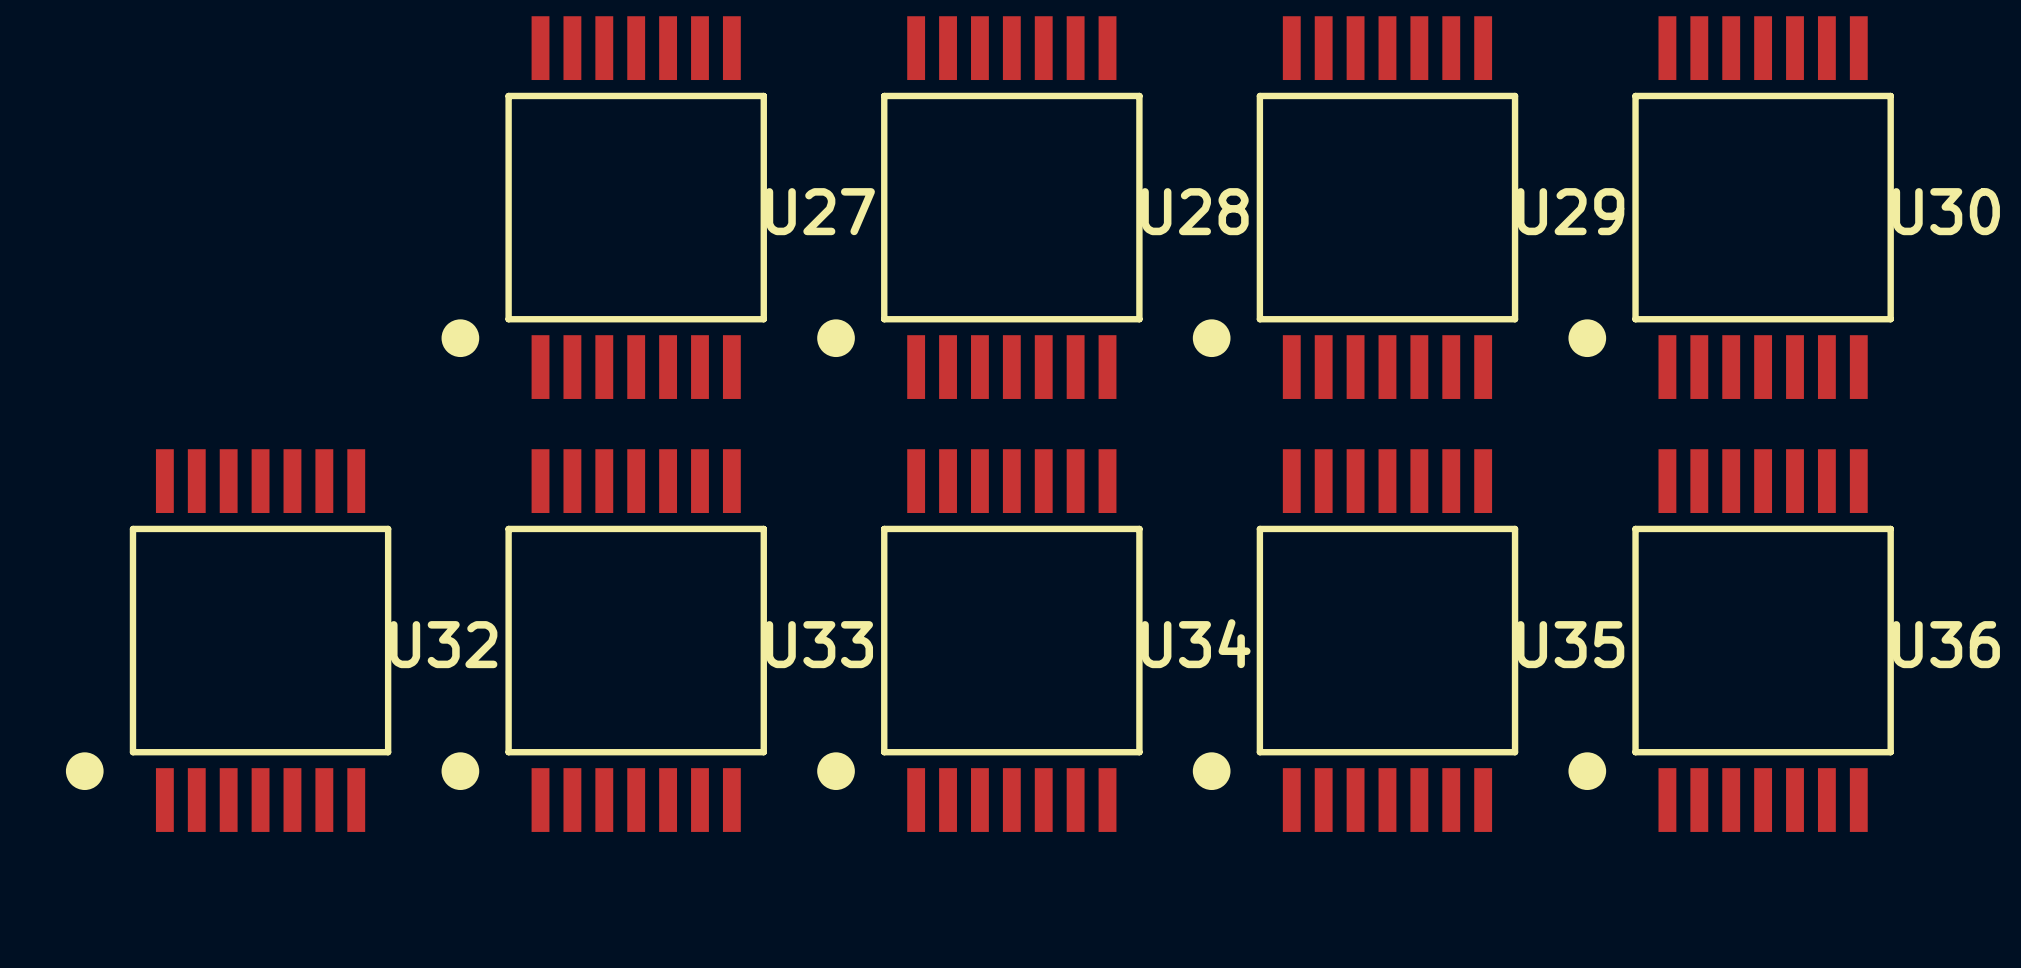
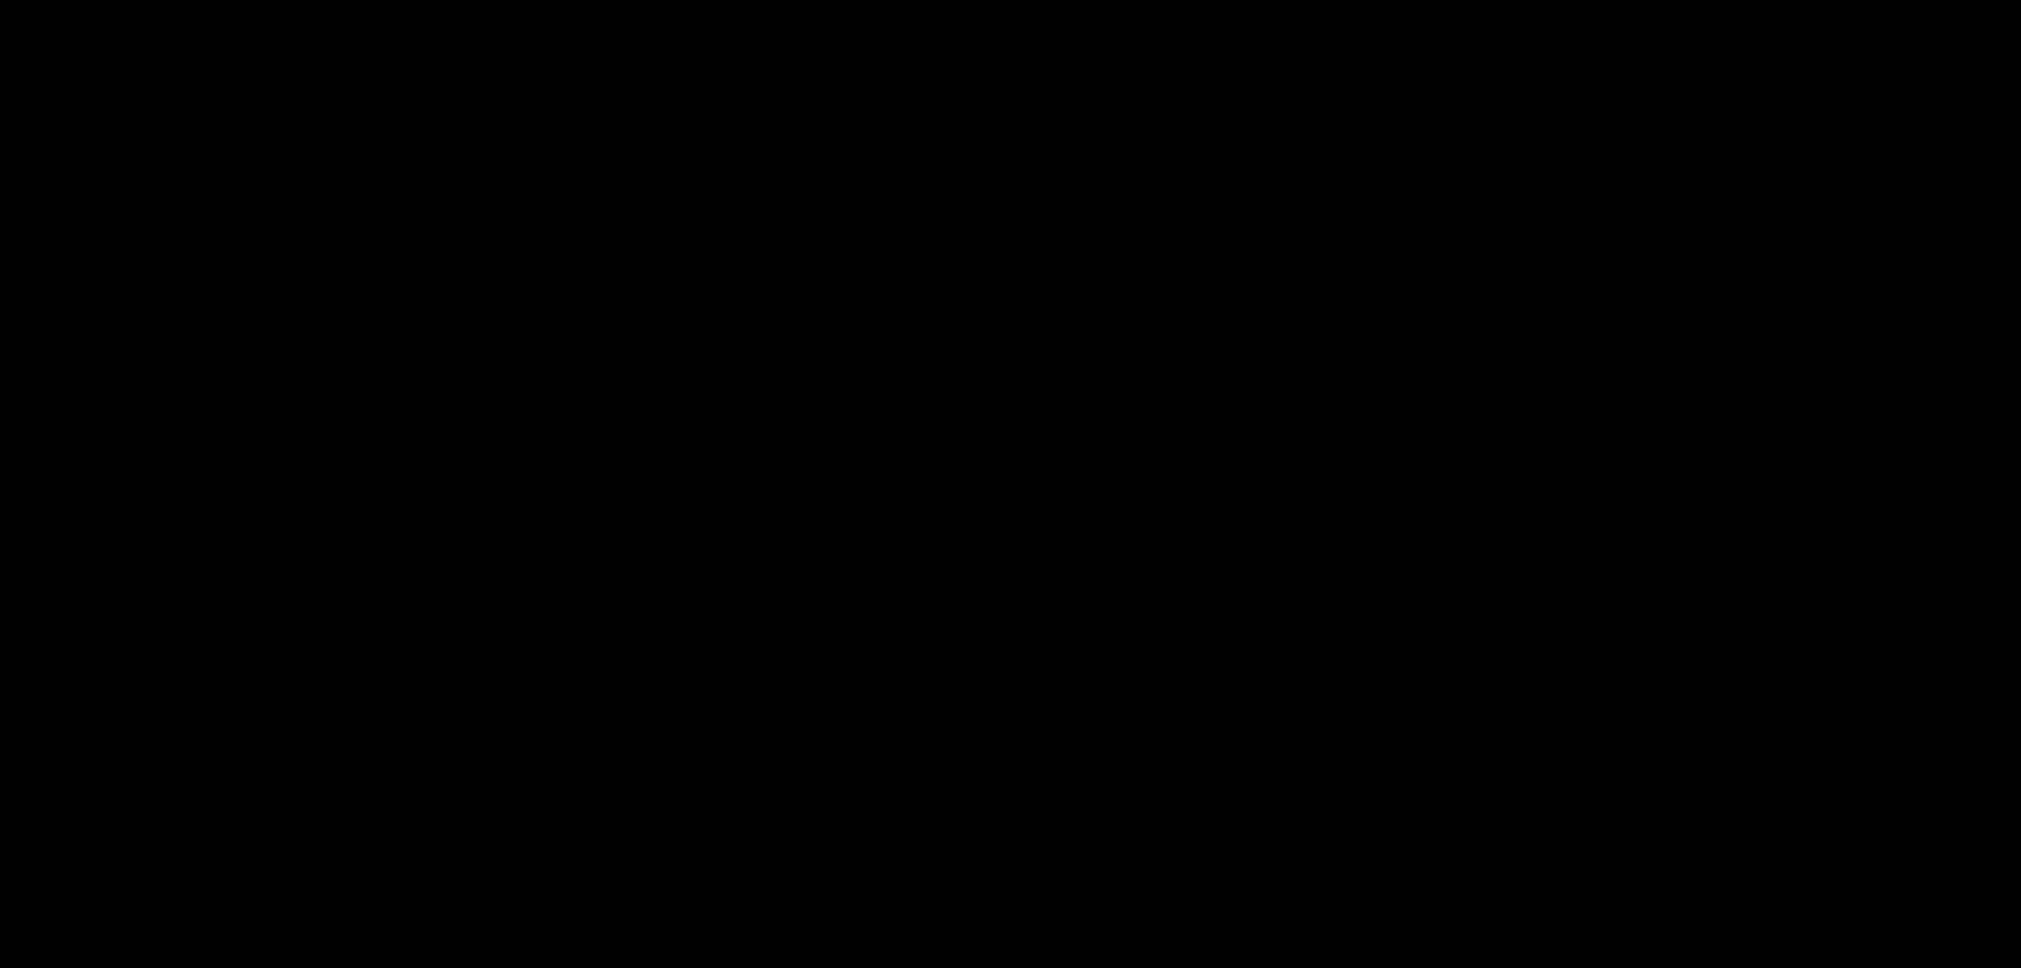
U27: (604, 207) -> none
U28: (979, 207) -> none
U29: (1355, 207) -> none
U30: (1731, 207) -> none
U32: (228, 640) -> none
U33: (604, 640) -> none
U34: (979, 640) -> none
U35: (1355, 640) -> none
U36: (1731, 640) -> none

